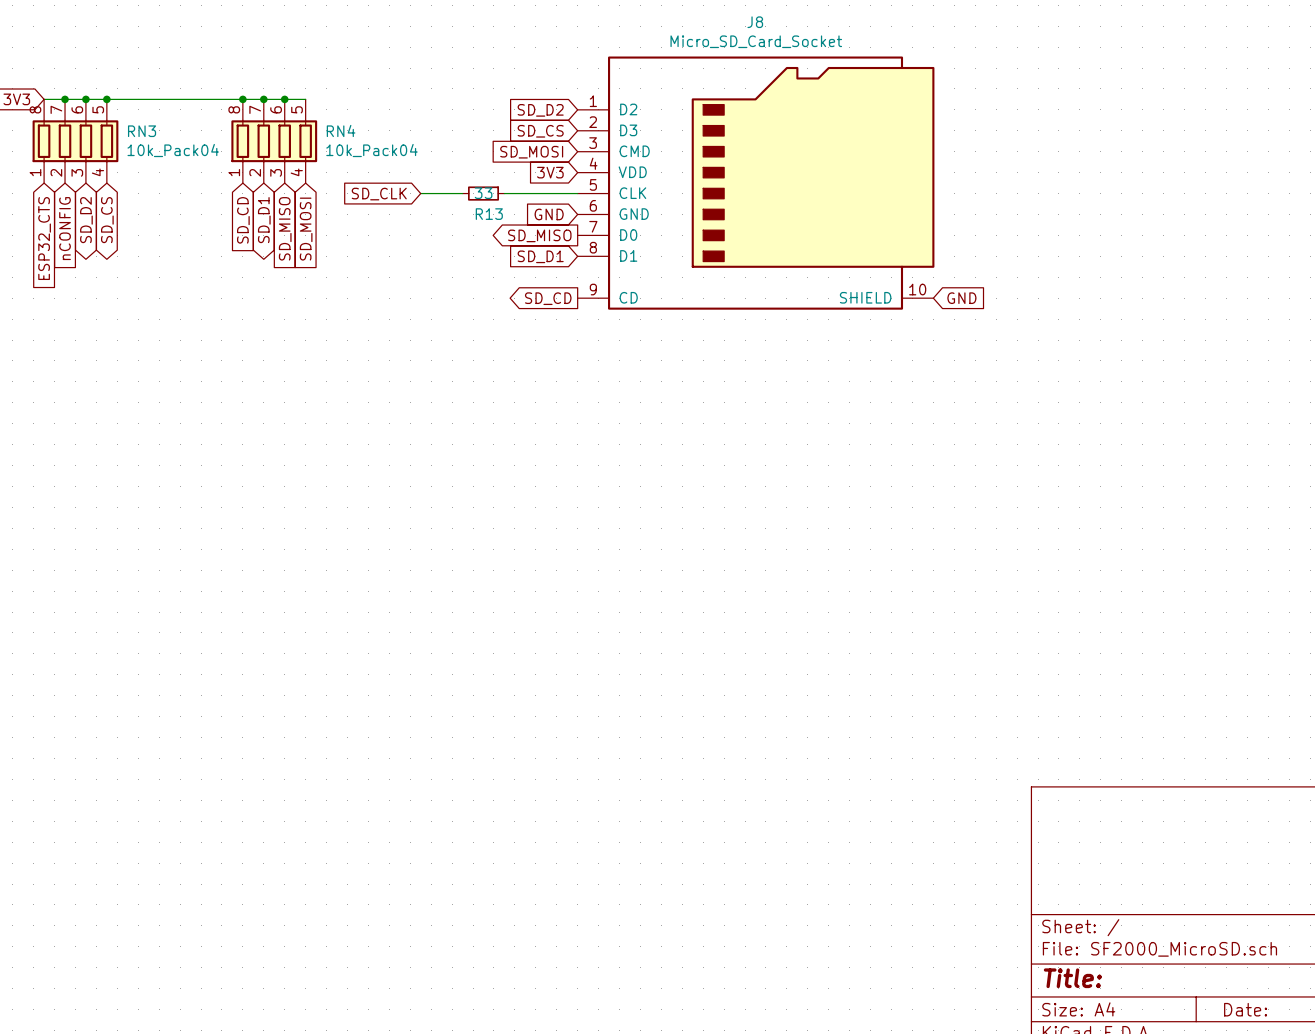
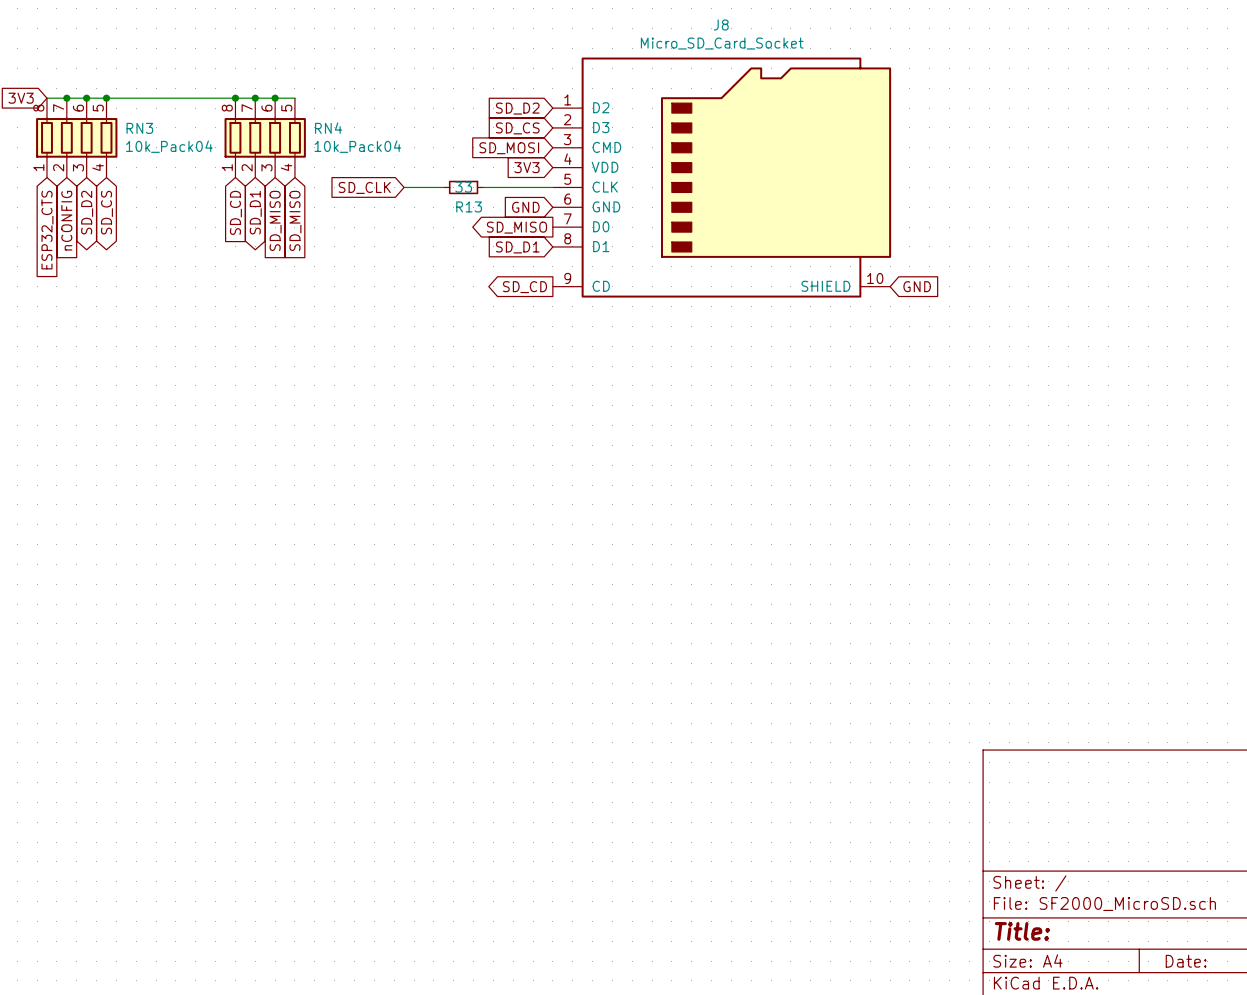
global label: SD_MOSI (306, 229) -> SD_MISO (295, 220)

